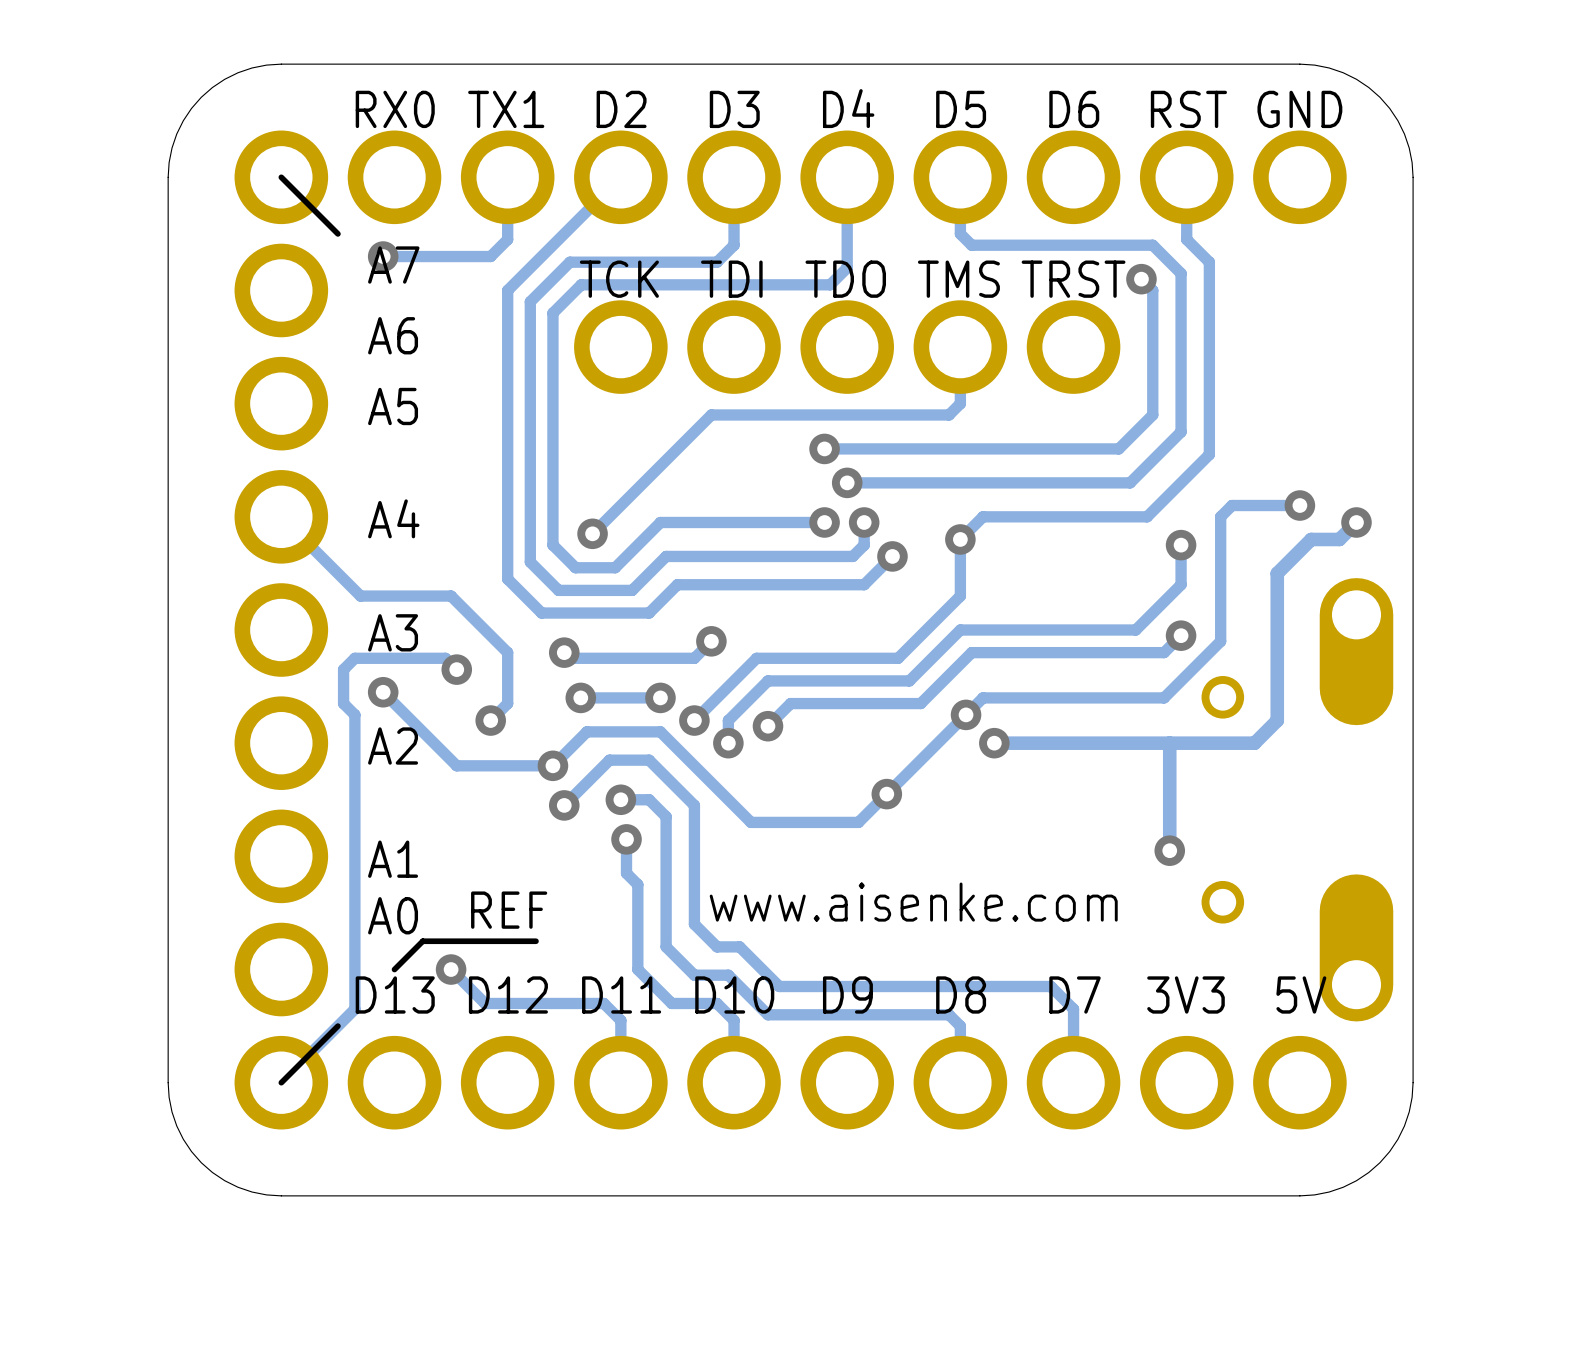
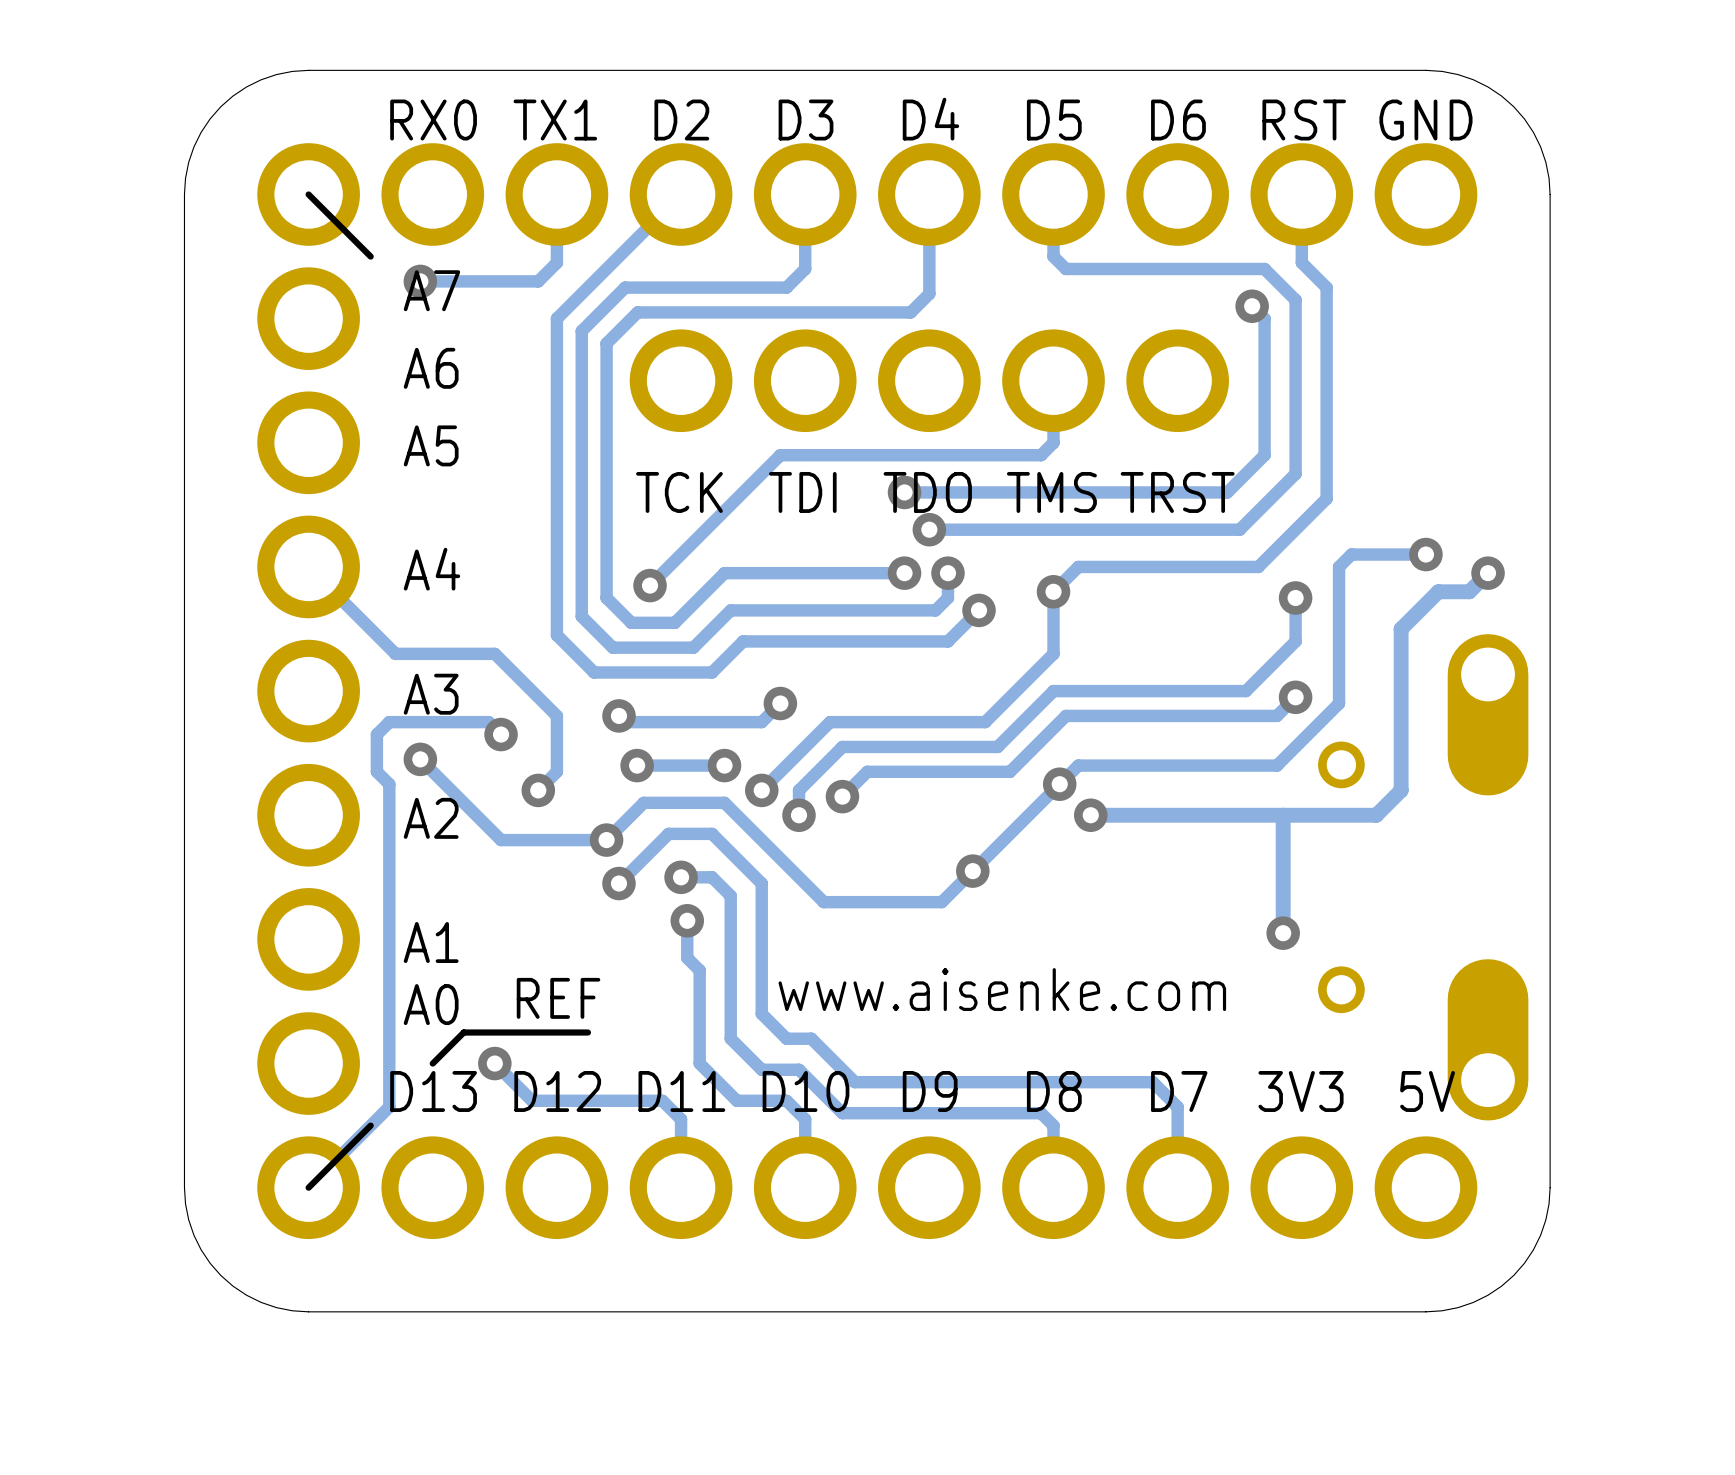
part text position: TCK (619, 279) -> TCK (679, 492)
part text position: TDI (731, 279) -> TDI (802, 492)
part text position: TDO (845, 279) -> TDO (927, 492)
part text position: TMS (958, 279) -> TMS (1051, 492)
part text position: TRST (1073, 279) -> TRST (1177, 492)

